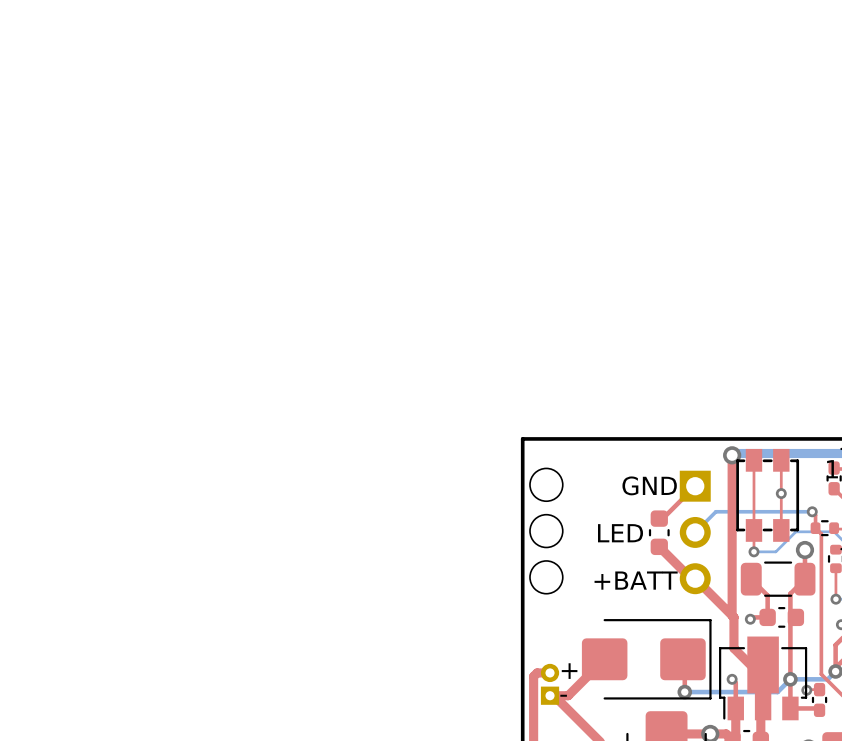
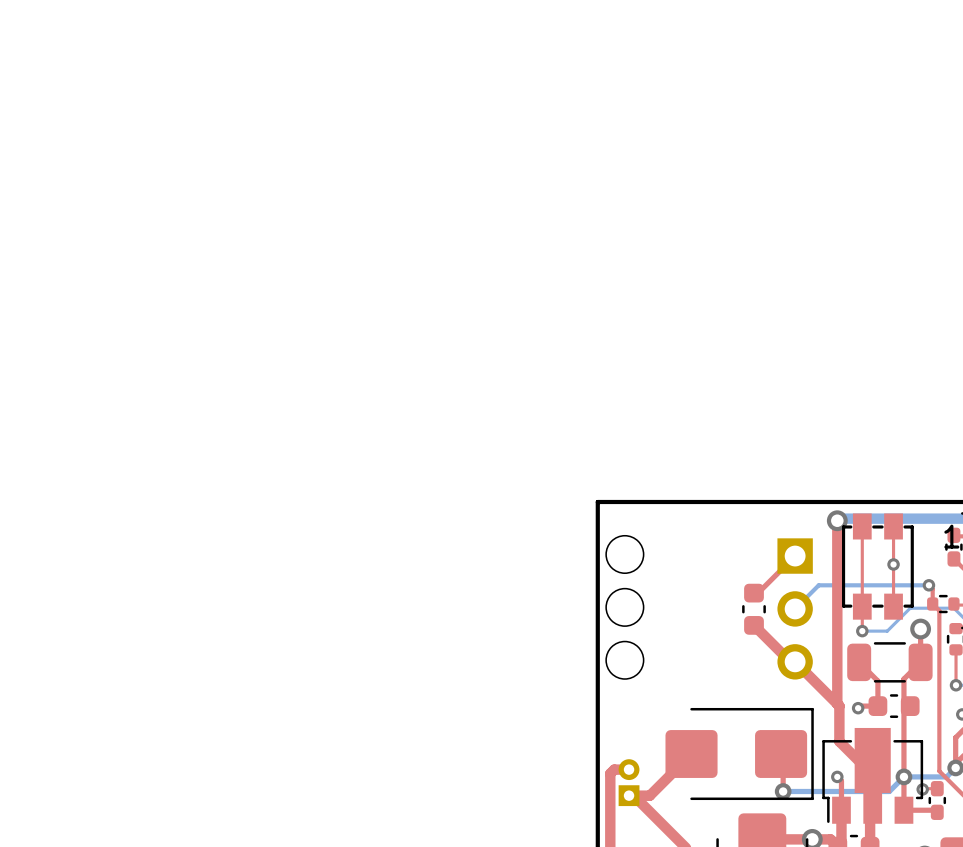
text: GND (649, 485) -> none
text: LED (620, 533) -> none
text: +BATT (636, 580) -> none
text: + (569, 671) -> none
text: - (563, 695) -> none

